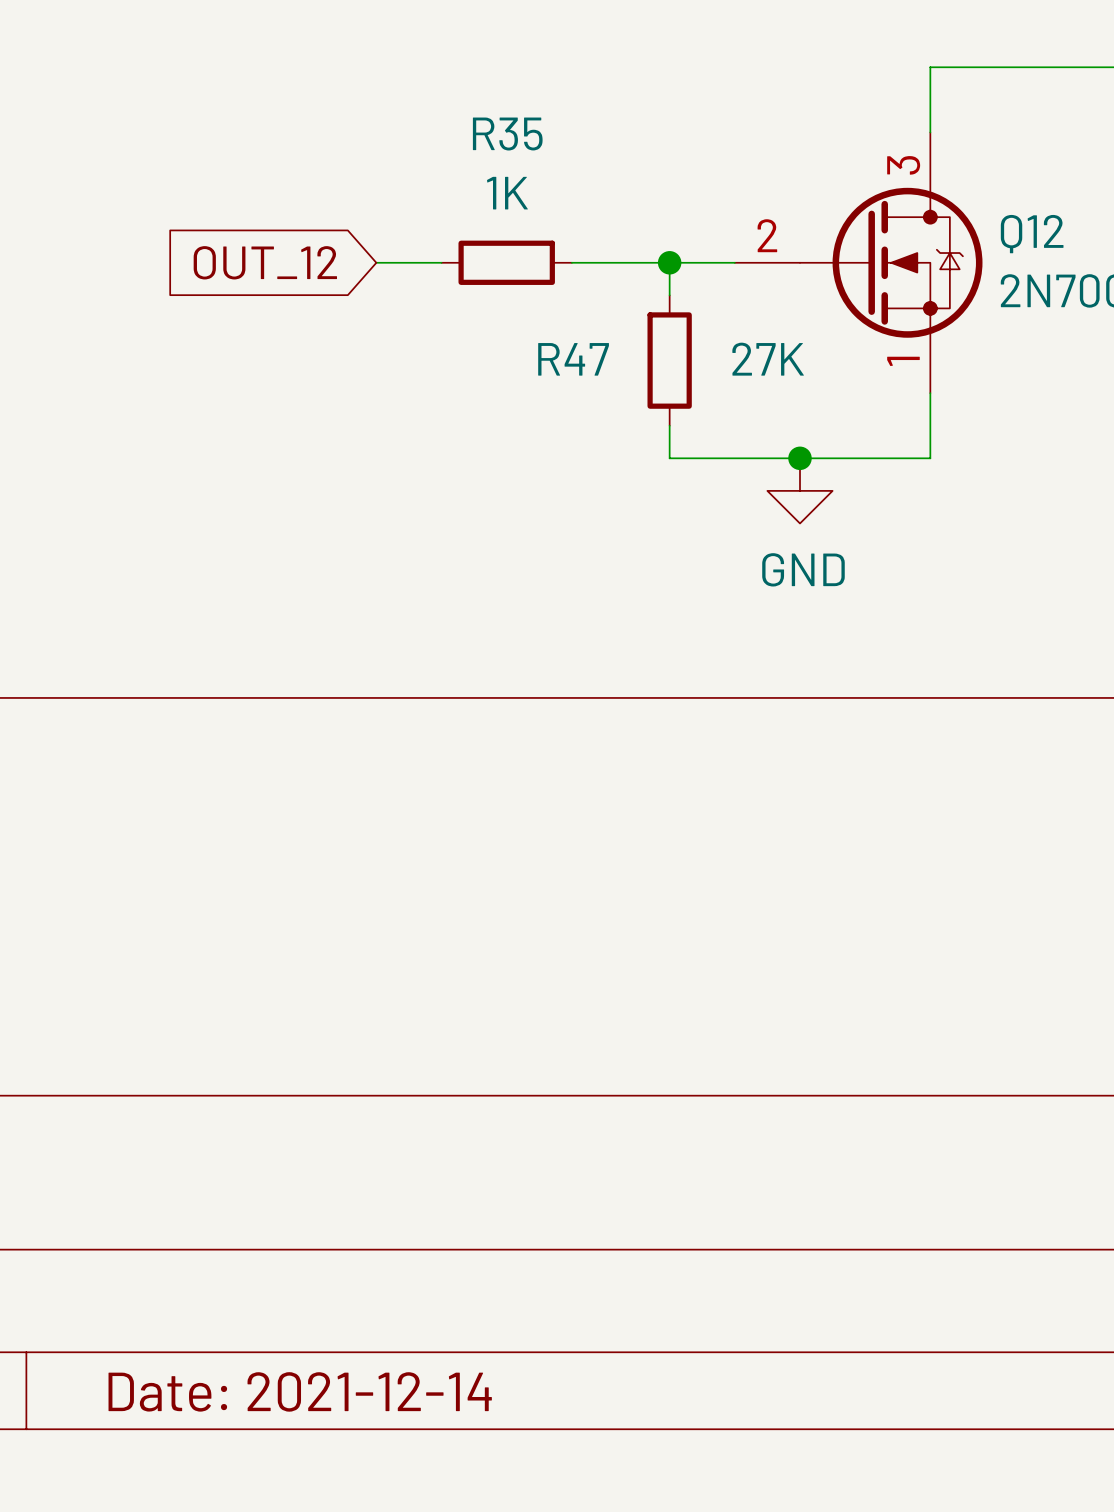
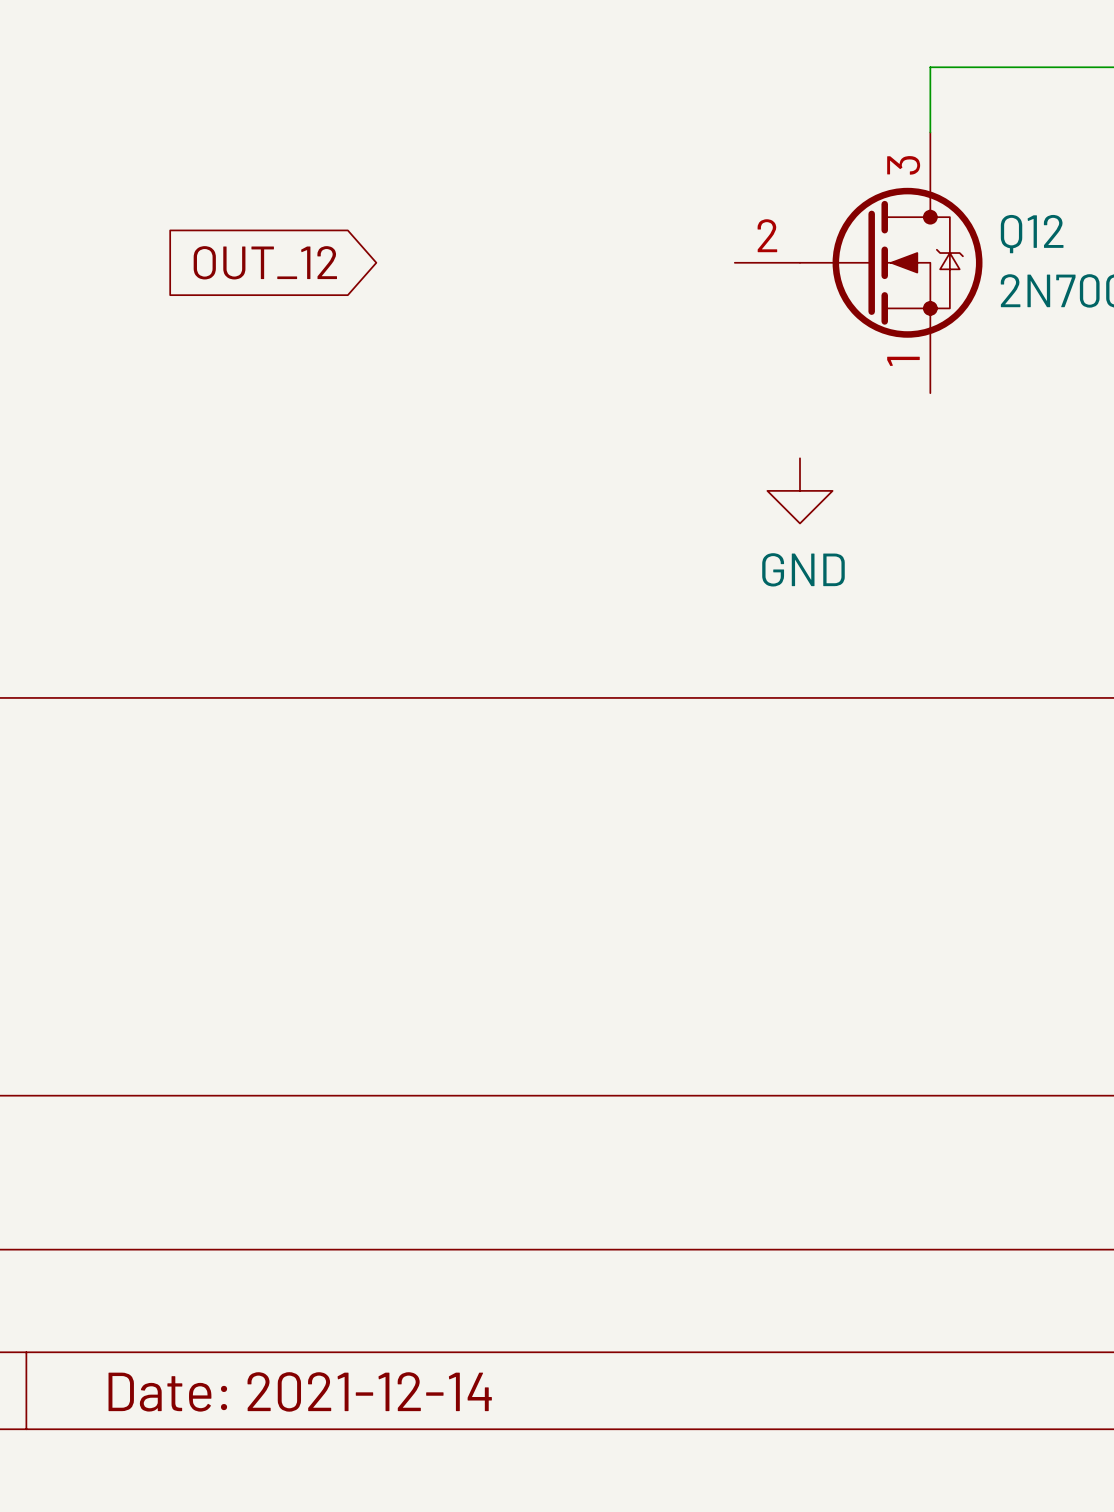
wire: (376, 262) (441, 262) -> none
R35: 1K (506, 262) -> none
wire: (571, 262) (734, 262) -> none
wire: (669, 262) (669, 295) -> none
junction: (669, 262) -> none
R47: 27K (669, 360) -> none
wire: (930, 393) (930, 458) (669, 458) (669, 425) -> none
junction: (800, 458) -> none

